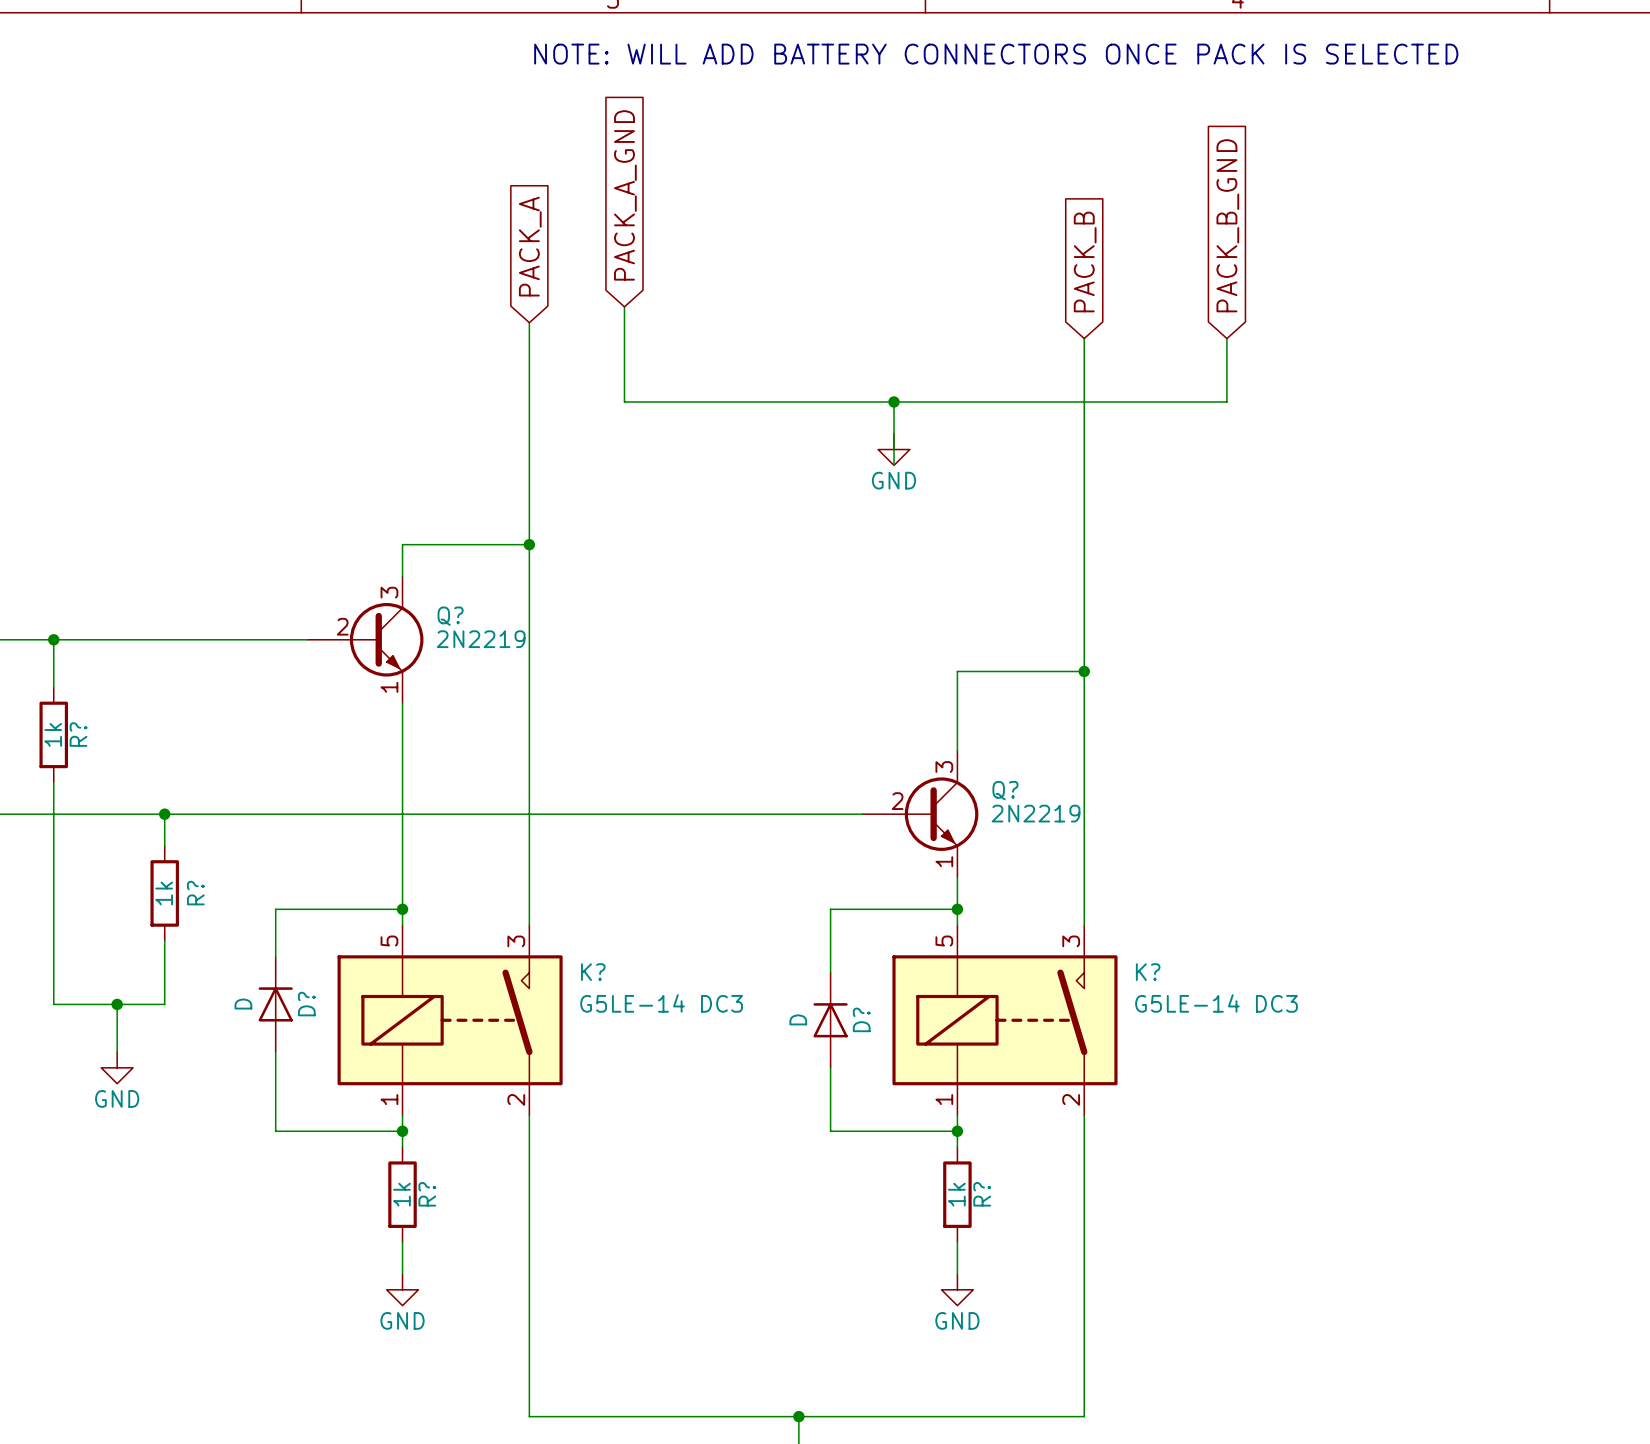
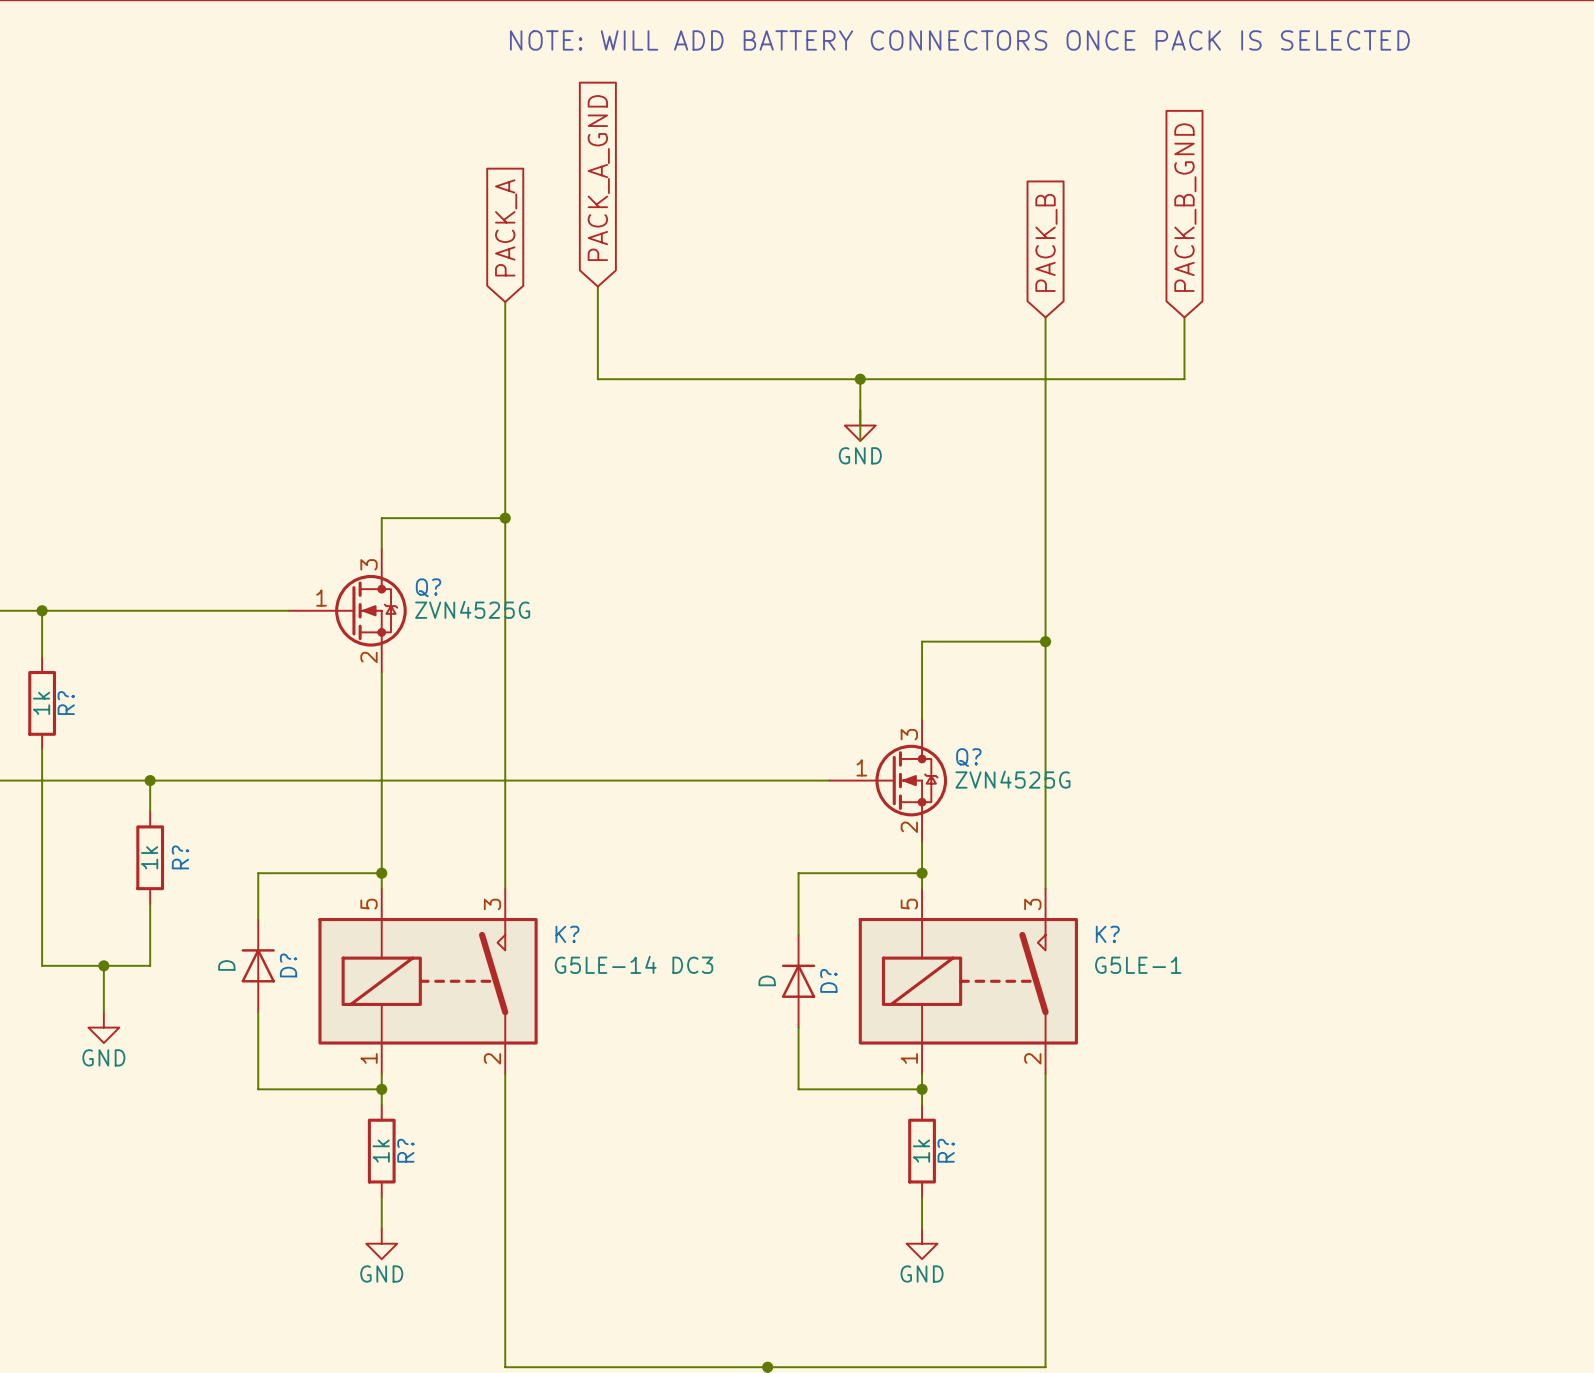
Q? symbol: [307, 576, 424, 704] -> [289, 549, 407, 673]
Q? value: 2N2219 (481, 639) -> ZVN4525G (472, 609)
Q? symbol: [862, 750, 979, 878] -> [829, 718, 948, 843]
Q? value: 2N2219 (1036, 813) -> ZVN4525G (1012, 779)
K? value: G5LE-14 DC3 (1216, 1003) -> G5LE-1 (1138, 965)

